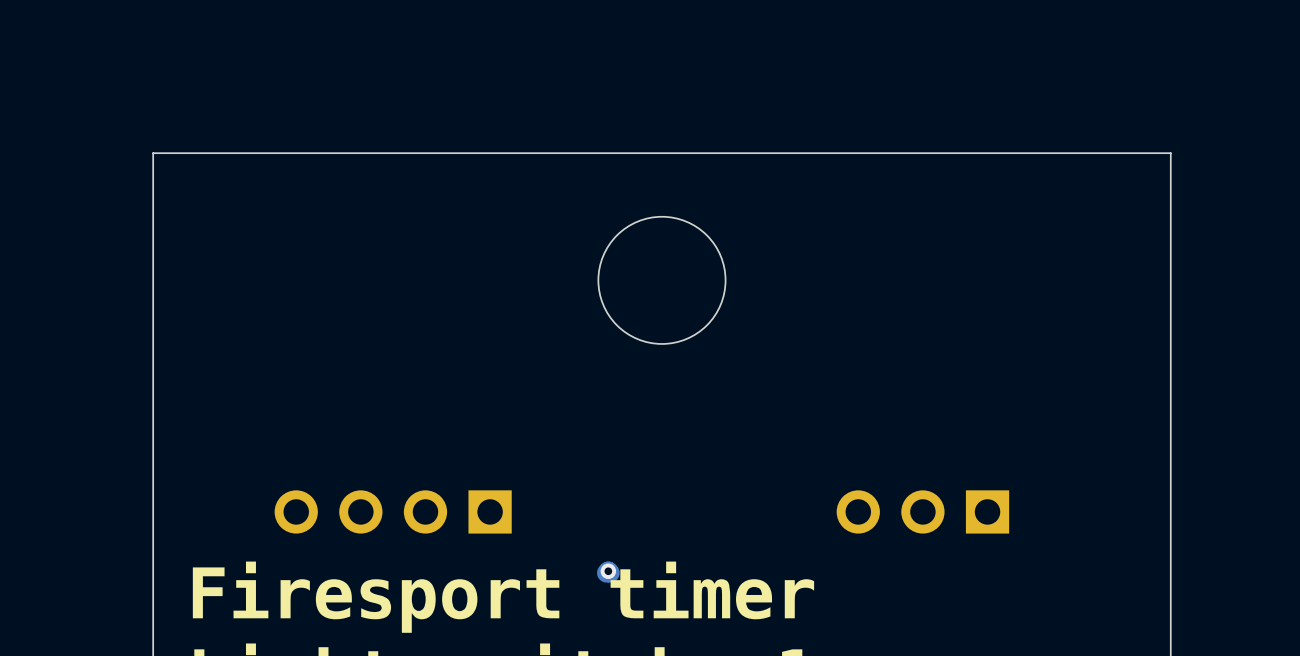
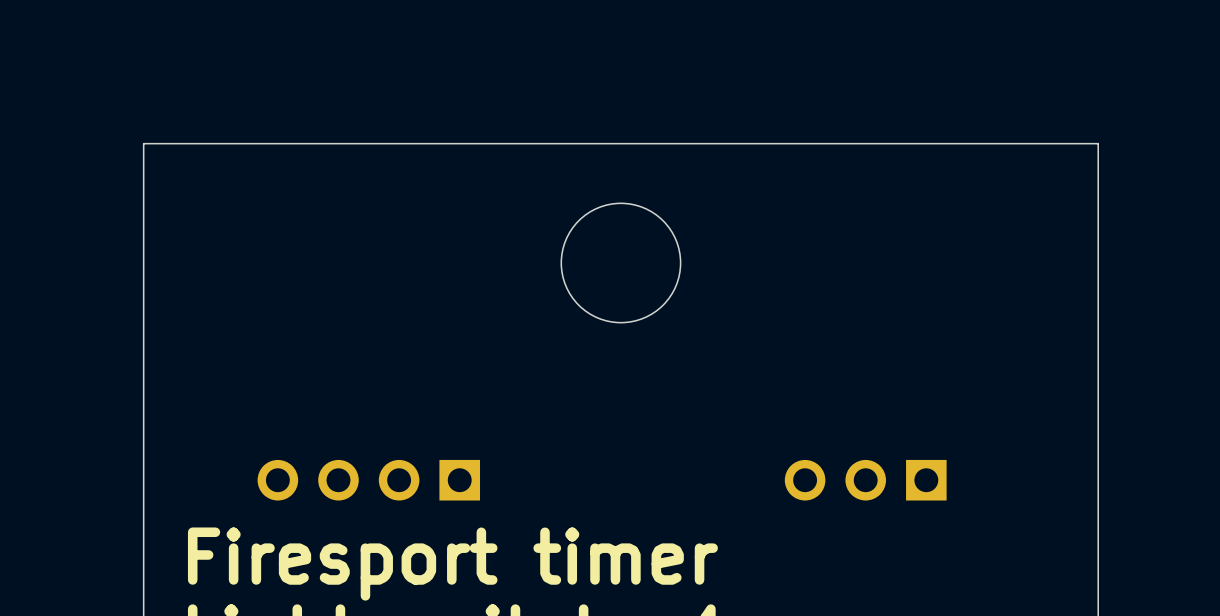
via: (608, 571) -> none
track: (610, 572) (608, 571) (606, 572) -> none

